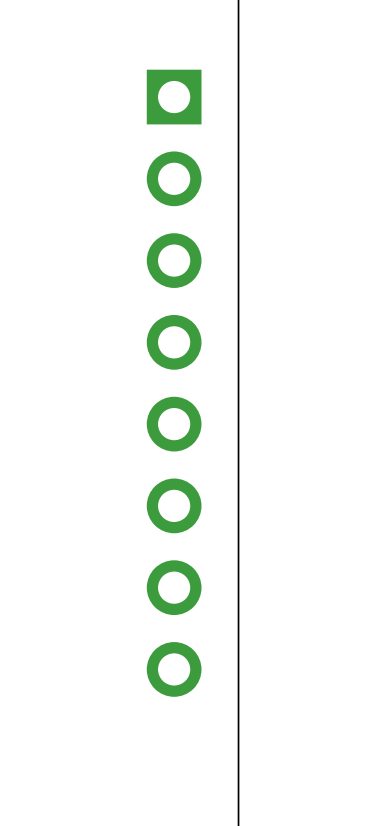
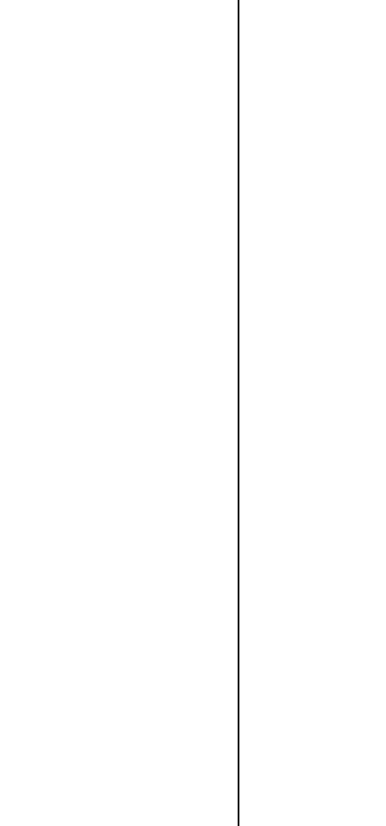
part: (174, 383) -> none

